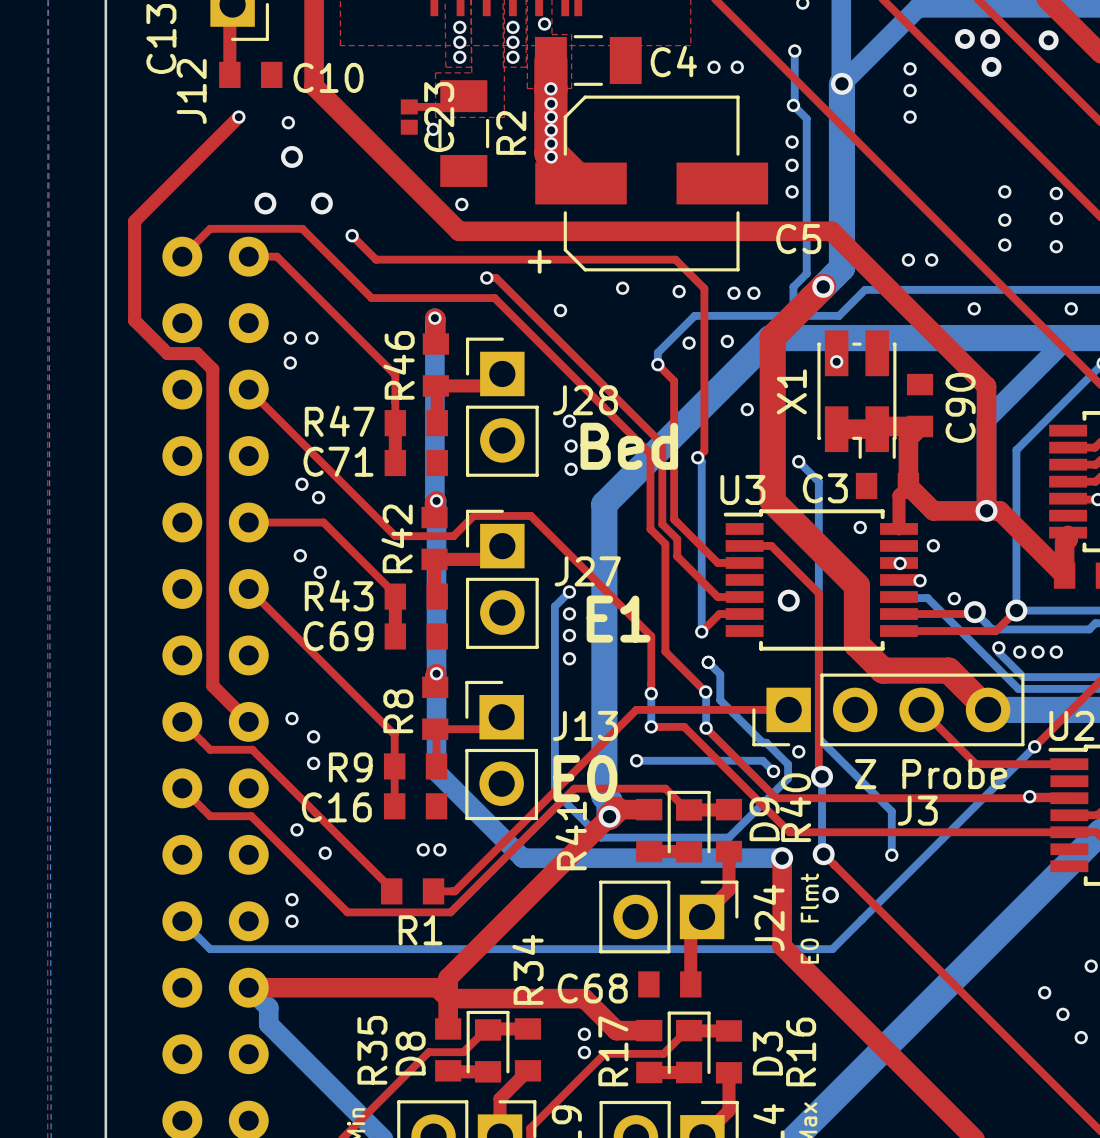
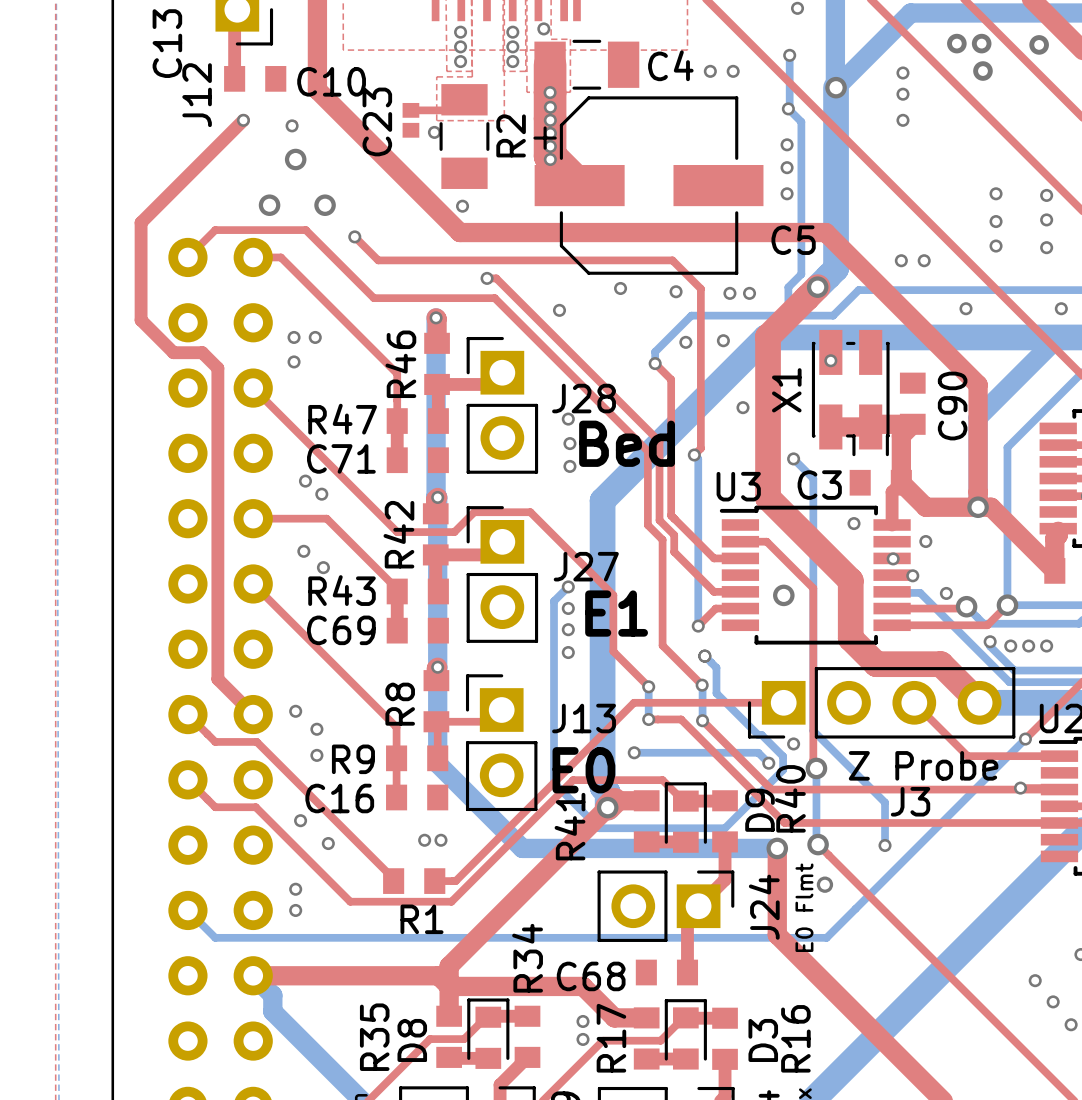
C5 footprint: [535, 95, 769, 272] -> [533, 96, 764, 275]
C23 name position: C23 (439, 117) -> C23 (377, 121)
top track: (615, 600) (651, 636) (651, 693) -> (613, 595) (613, 651) (648, 686)

